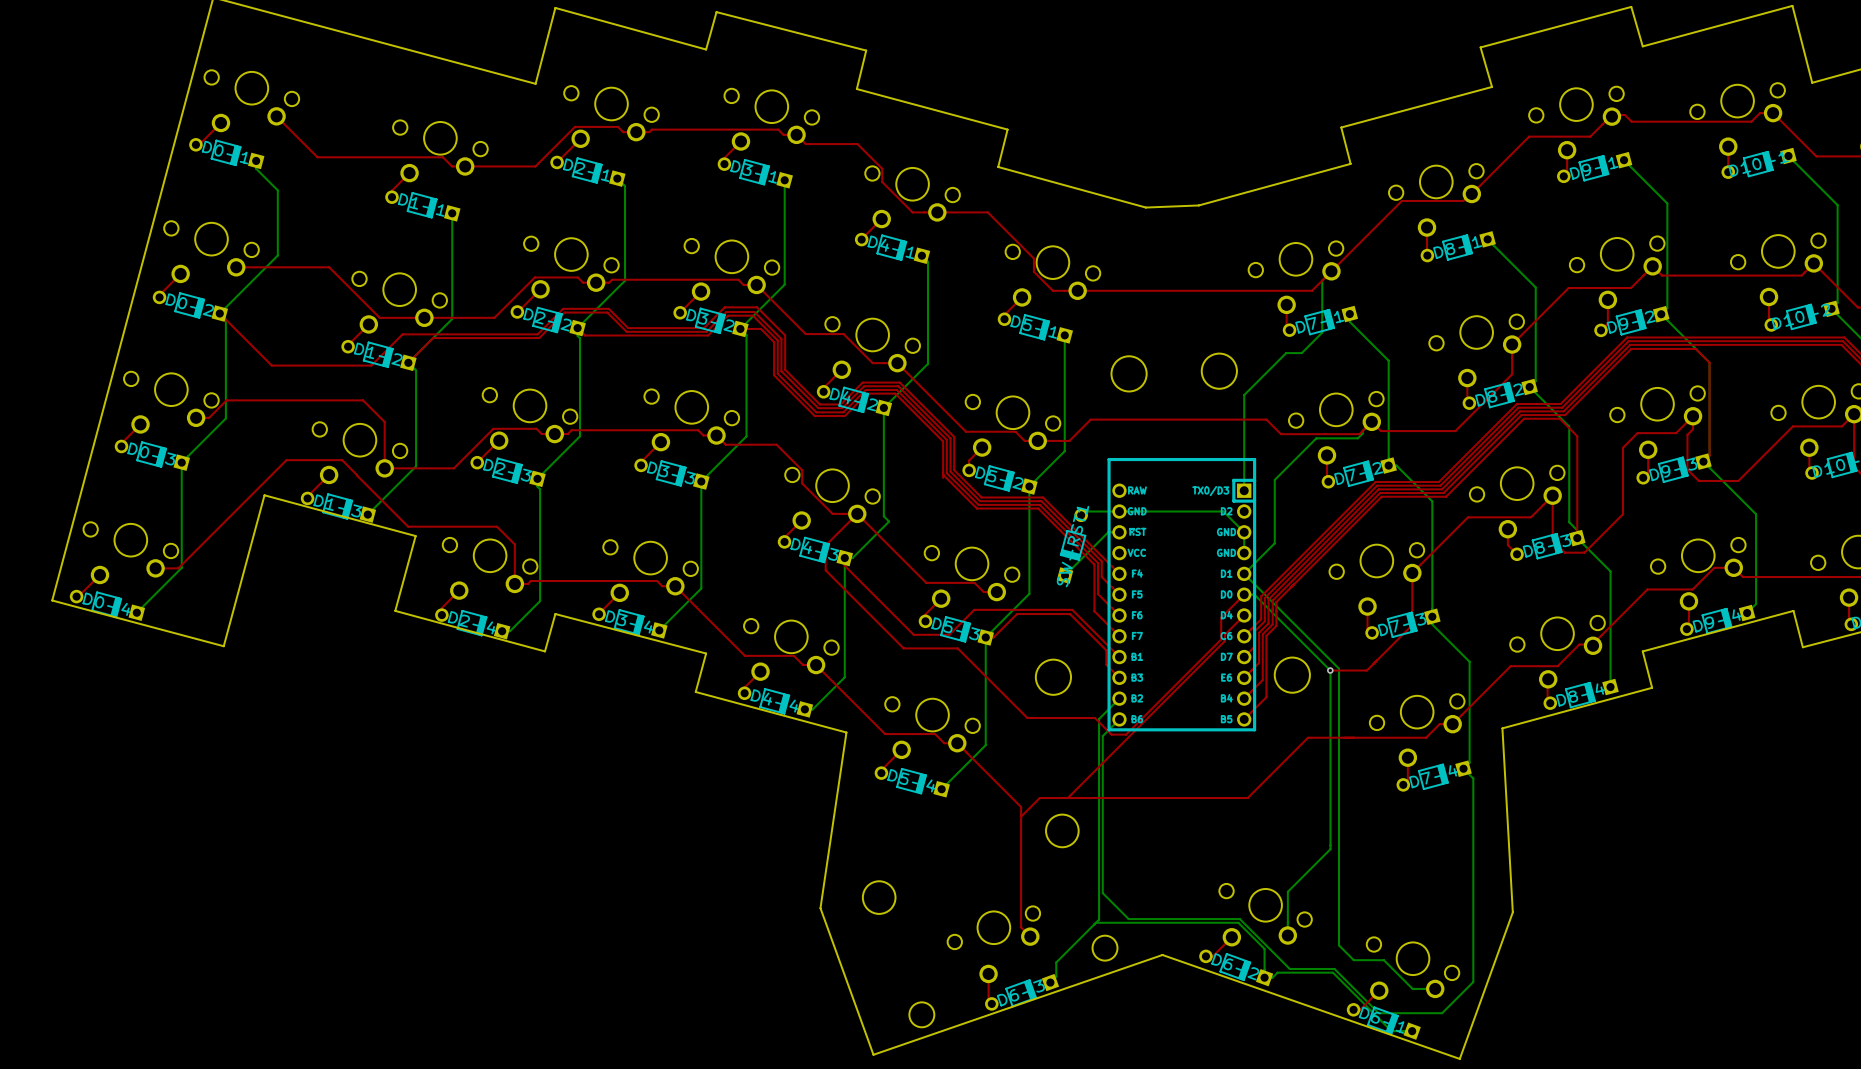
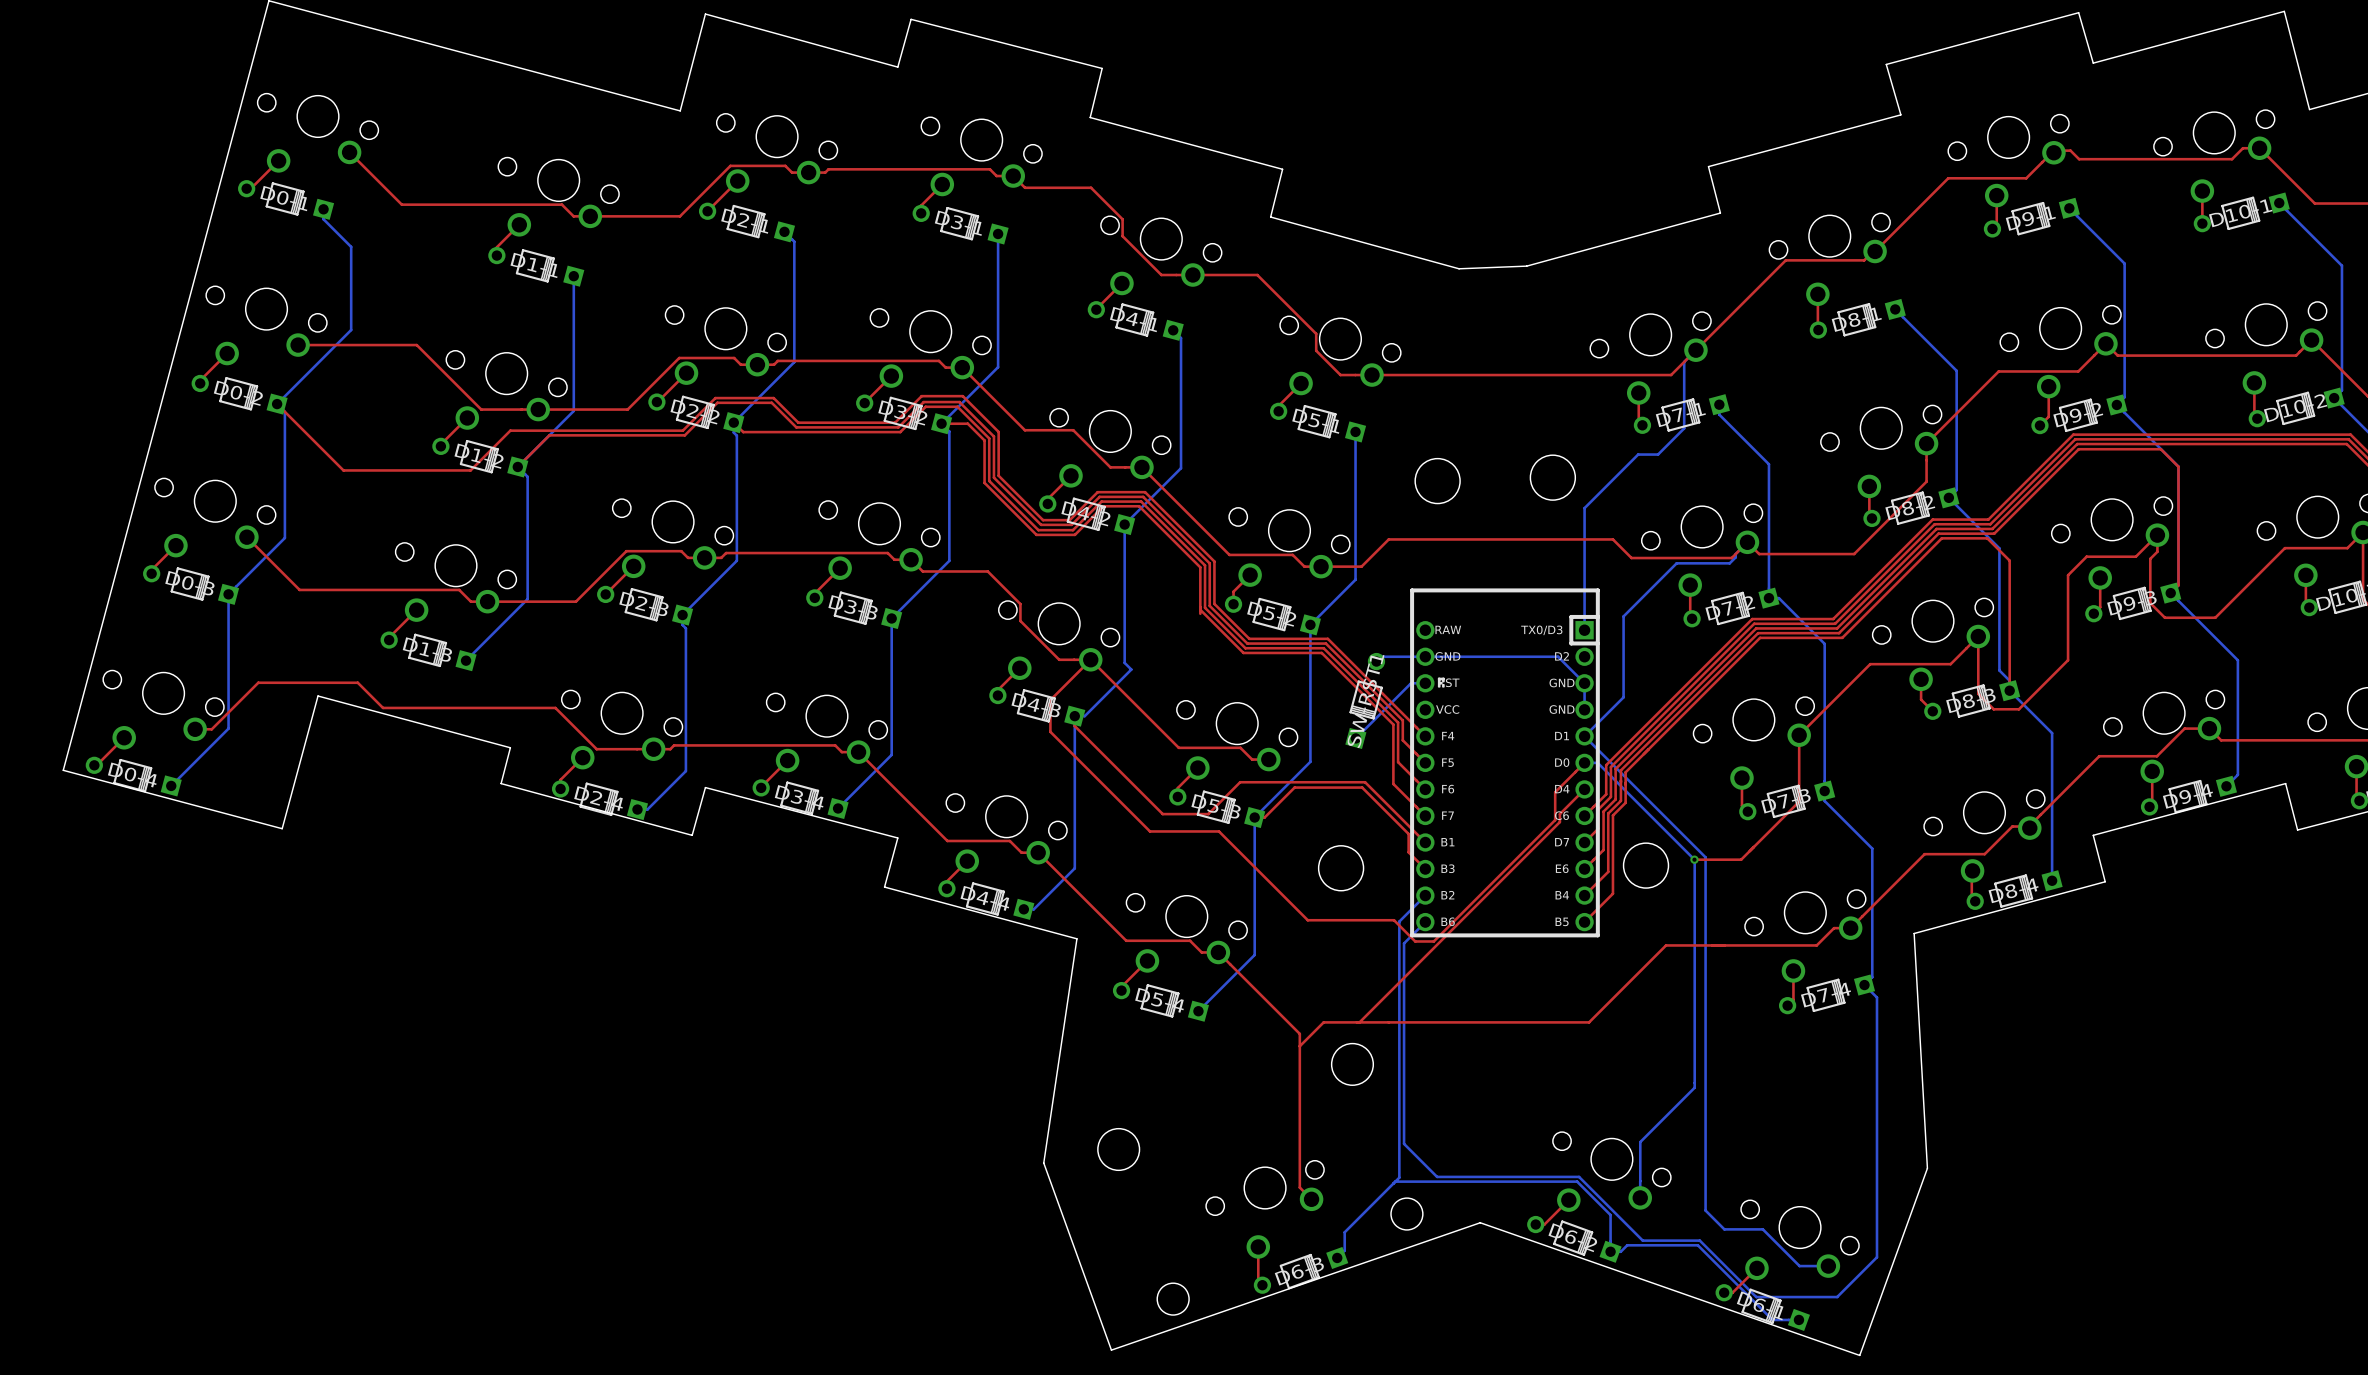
top track: (196, 417) (209, 417) (226, 400) (363, 400) (384, 422) (384, 468) -> (246, 537) (299, 589) (459, 589) (470, 601) (487, 601)
board edge: (251, 542) (264, 495) (415, 536) (395, 610) -> (318, 696) (510, 747) (501, 783)
top track: (168, 568) (178, 568) (286, 460) (342, 460) (408, 526) (497, 526) (514, 544) (514, 583) -> (211, 729) (258, 682) (357, 682) (383, 707) (555, 707) (596, 749) (653, 749)

